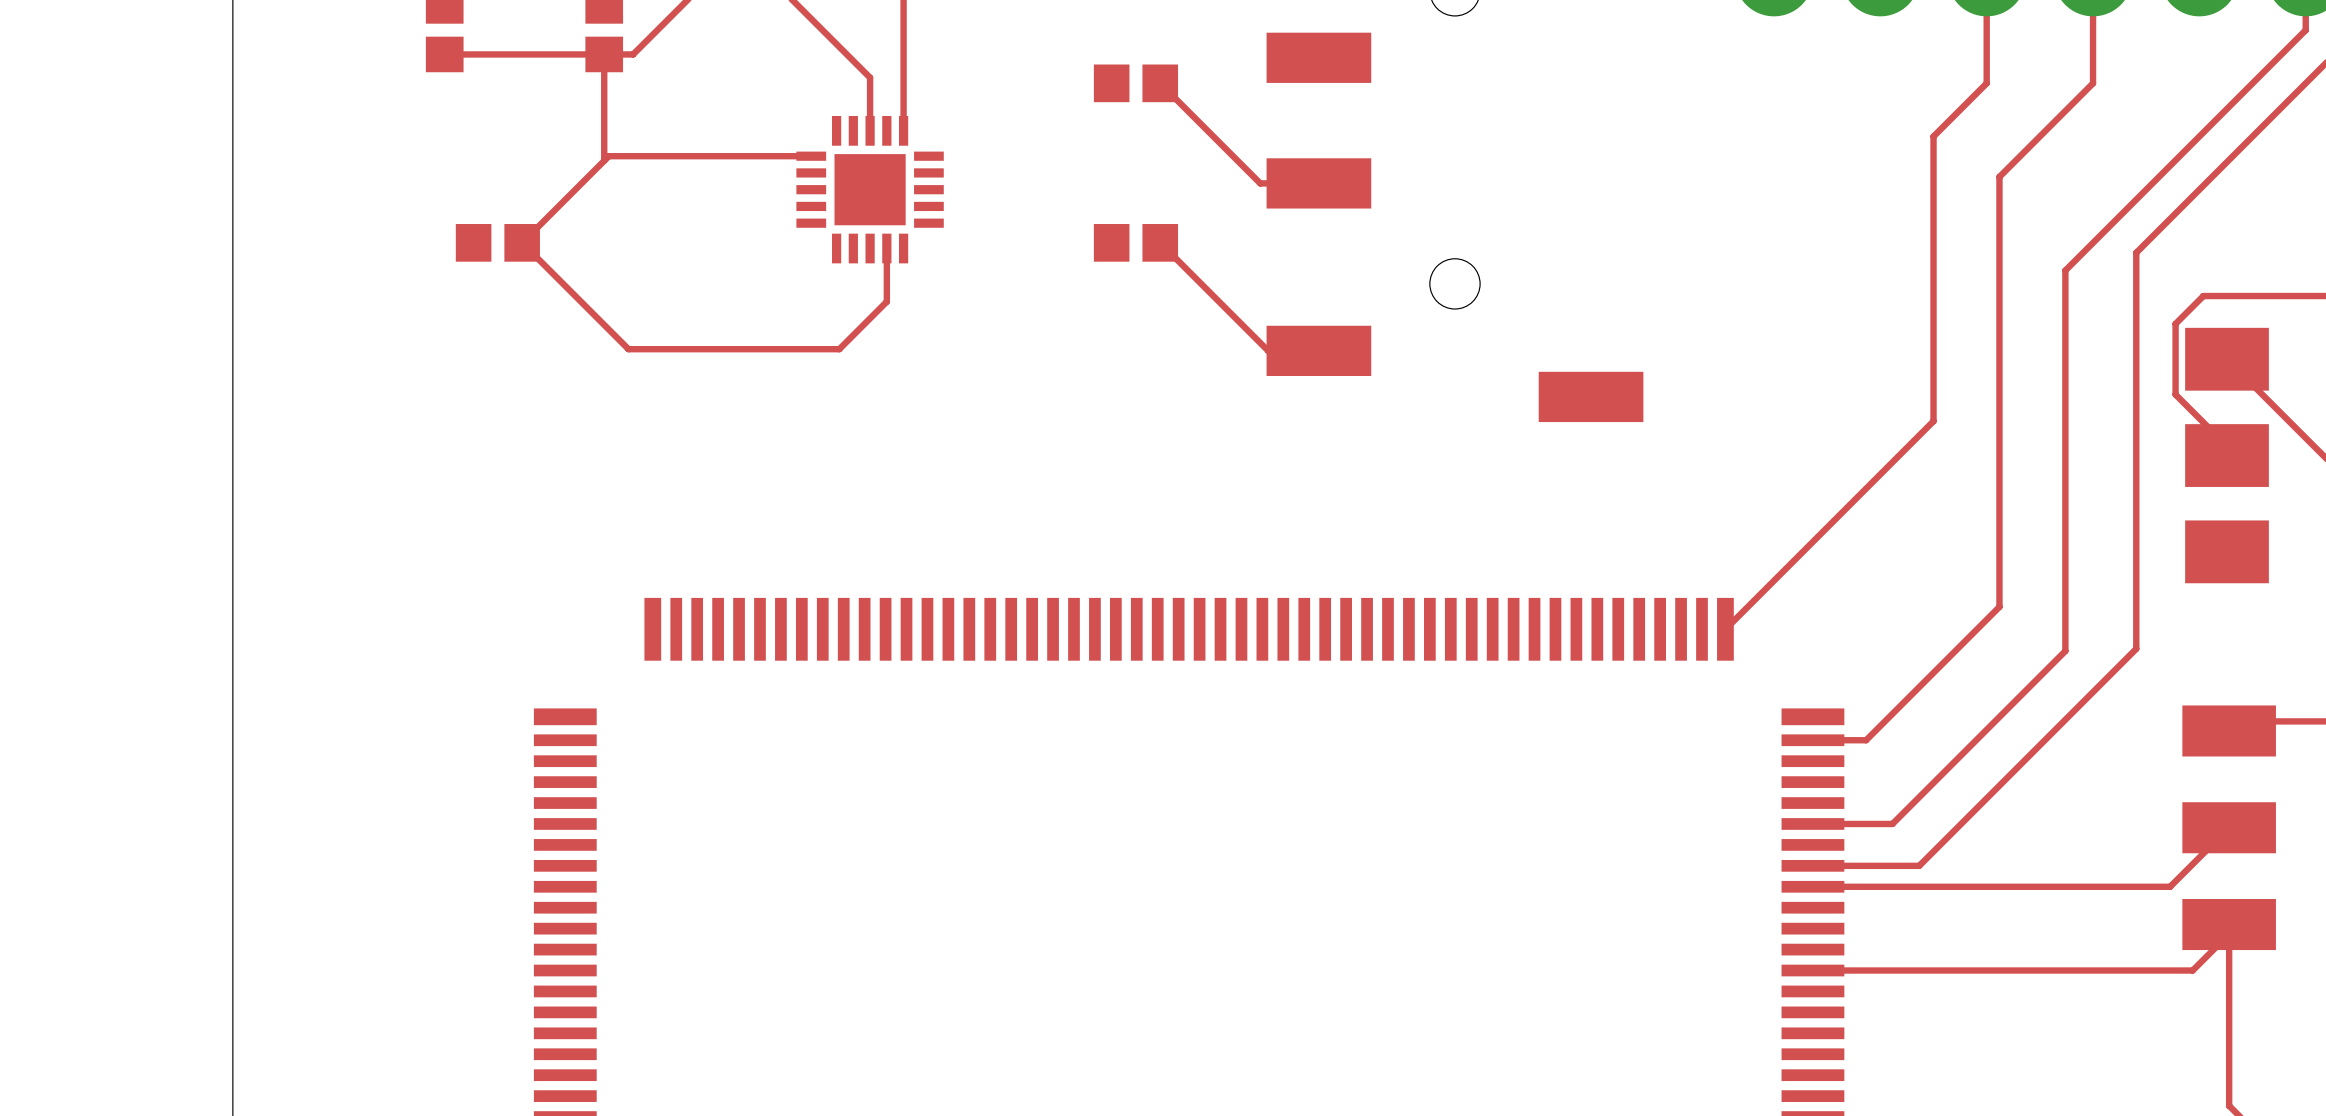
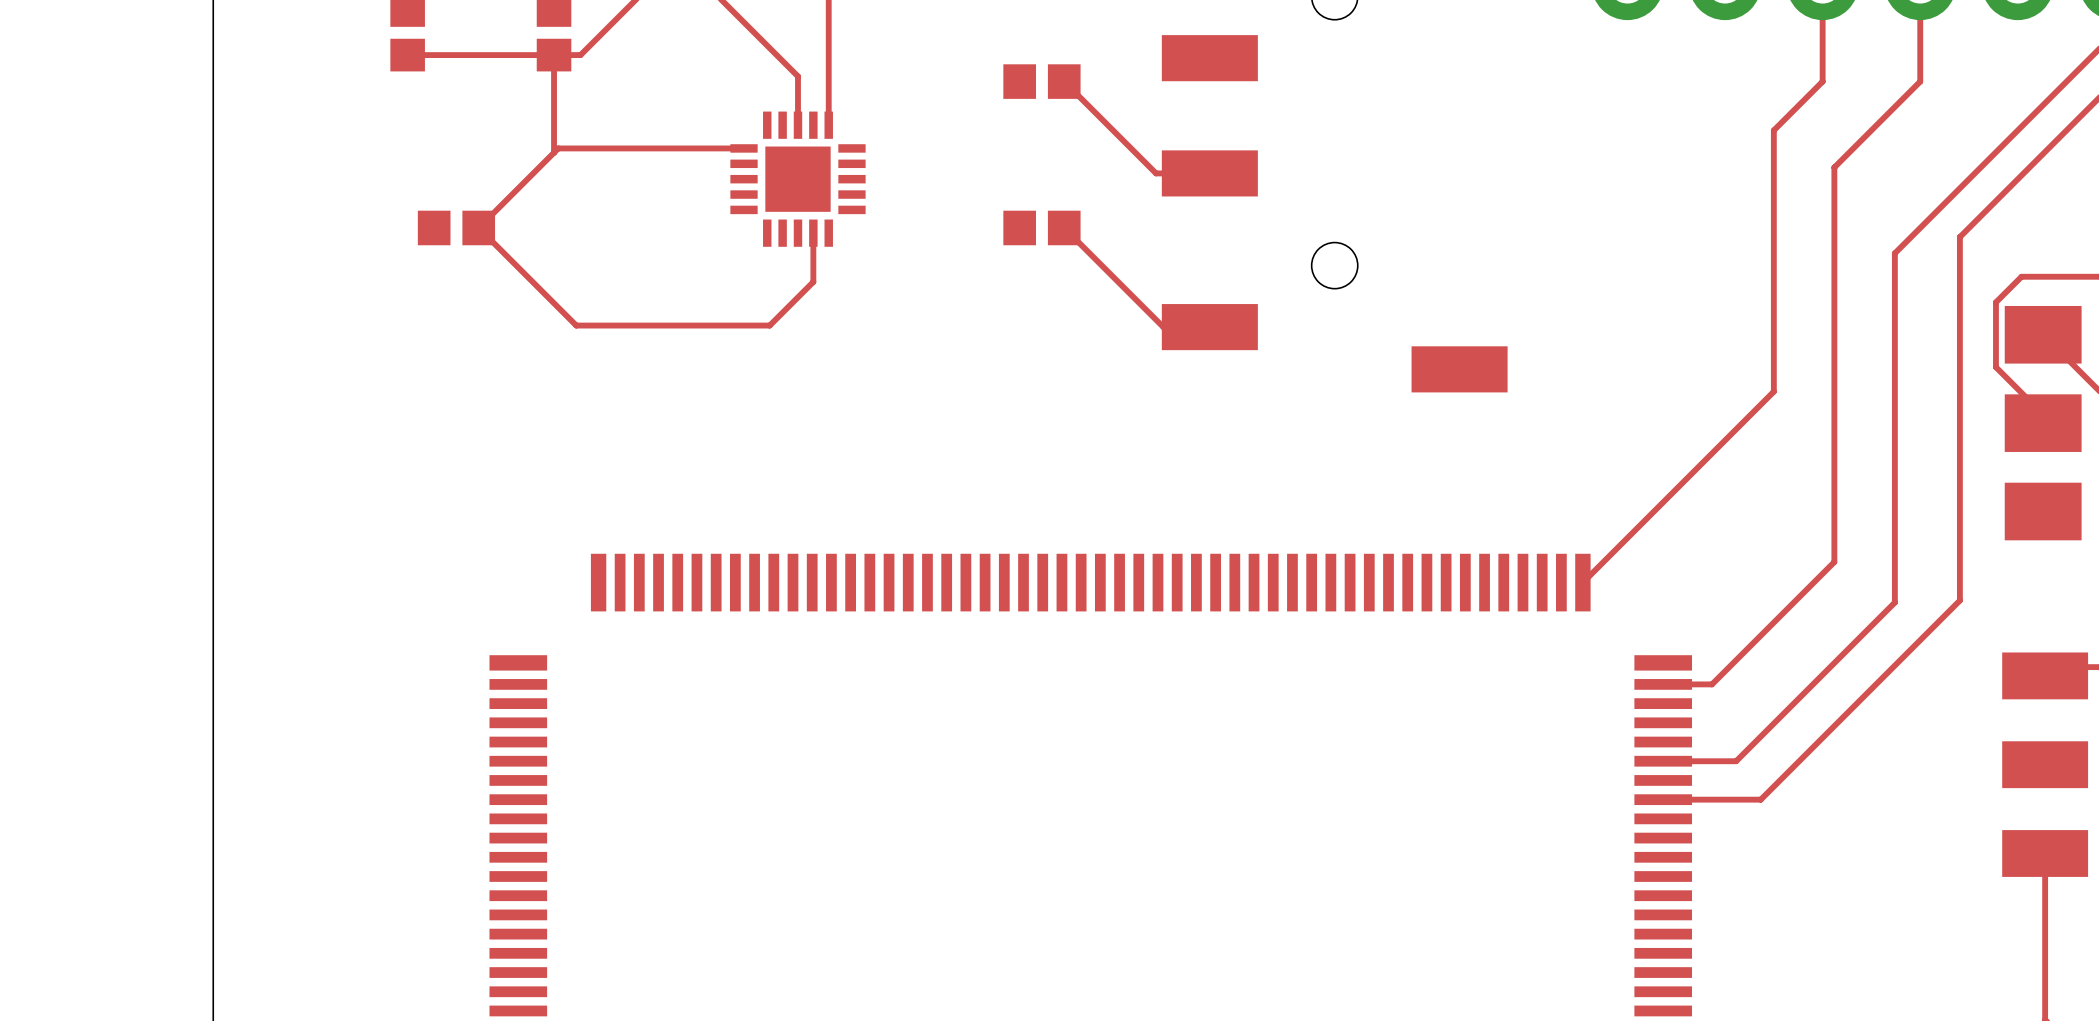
top track: (2229, 827) (2170, 886) (1812, 886) -> none
top track: (2229, 934) (2192, 970) (1812, 970) -> none

